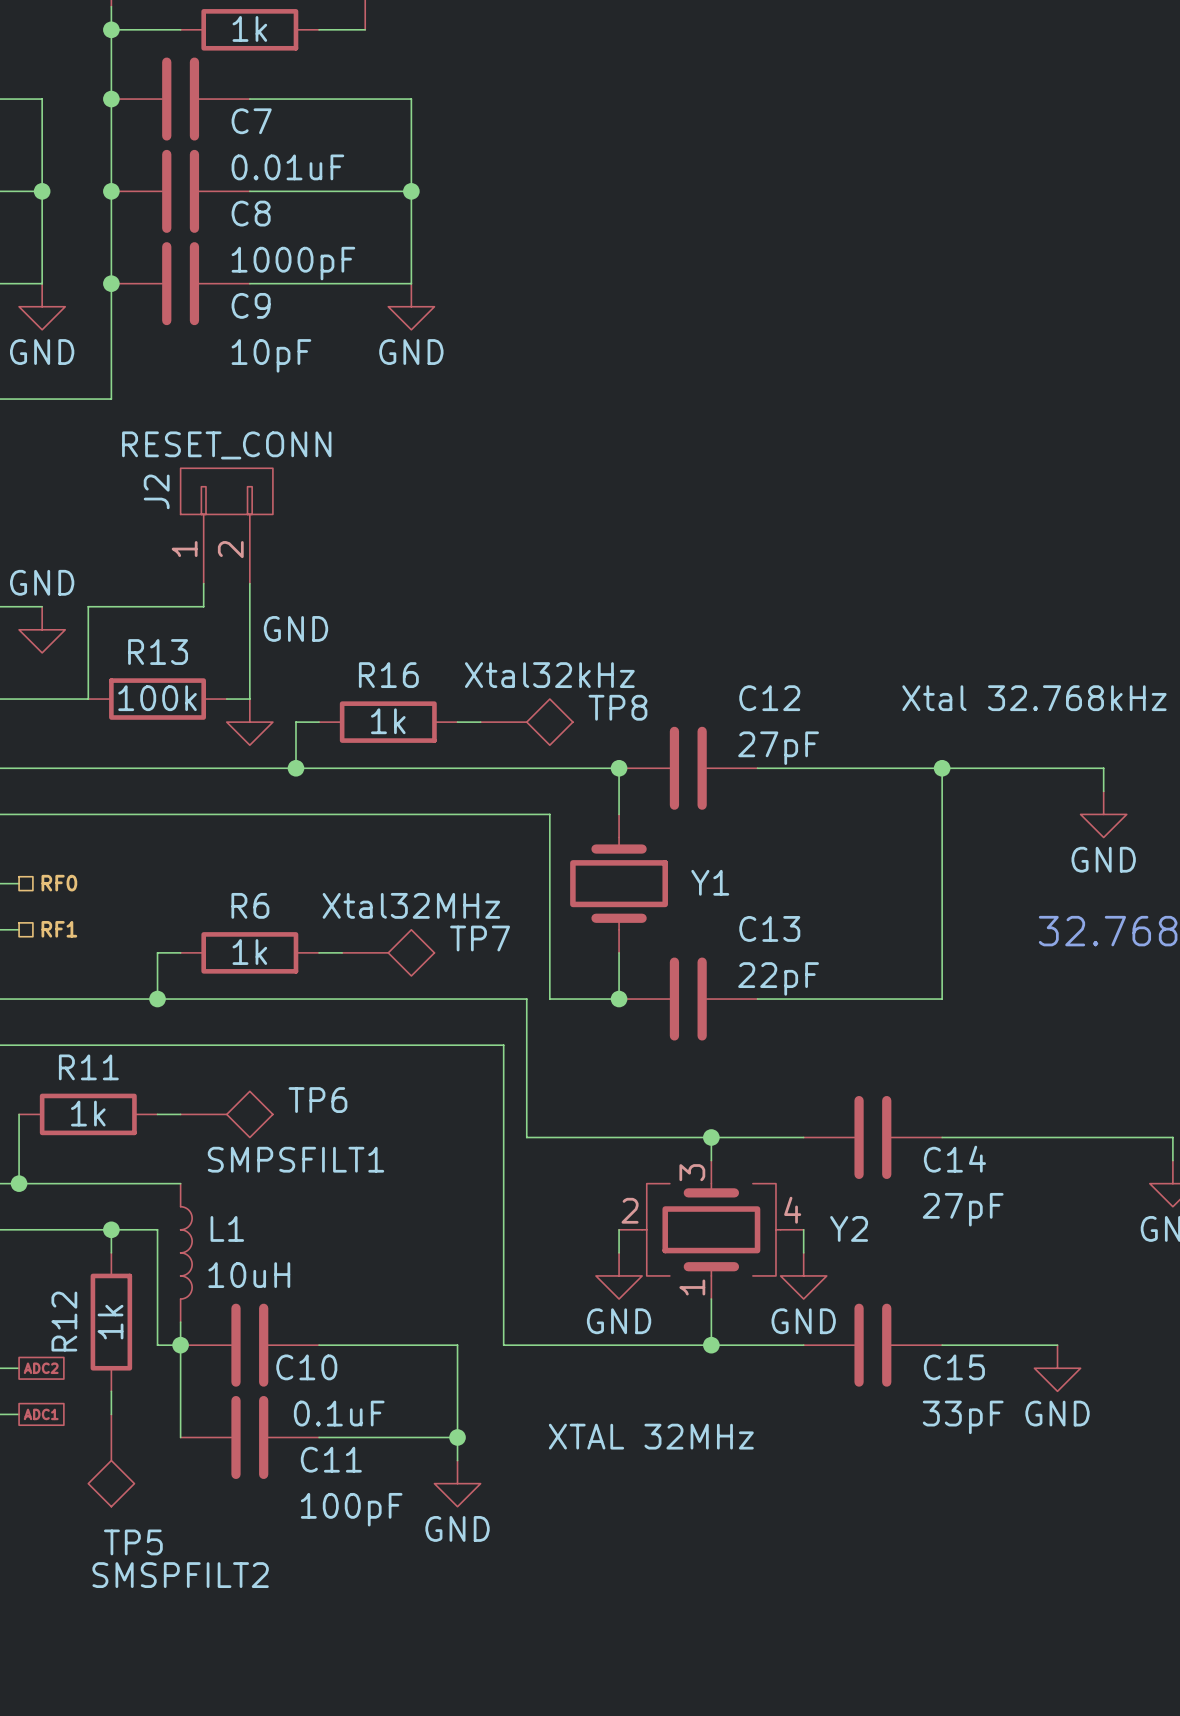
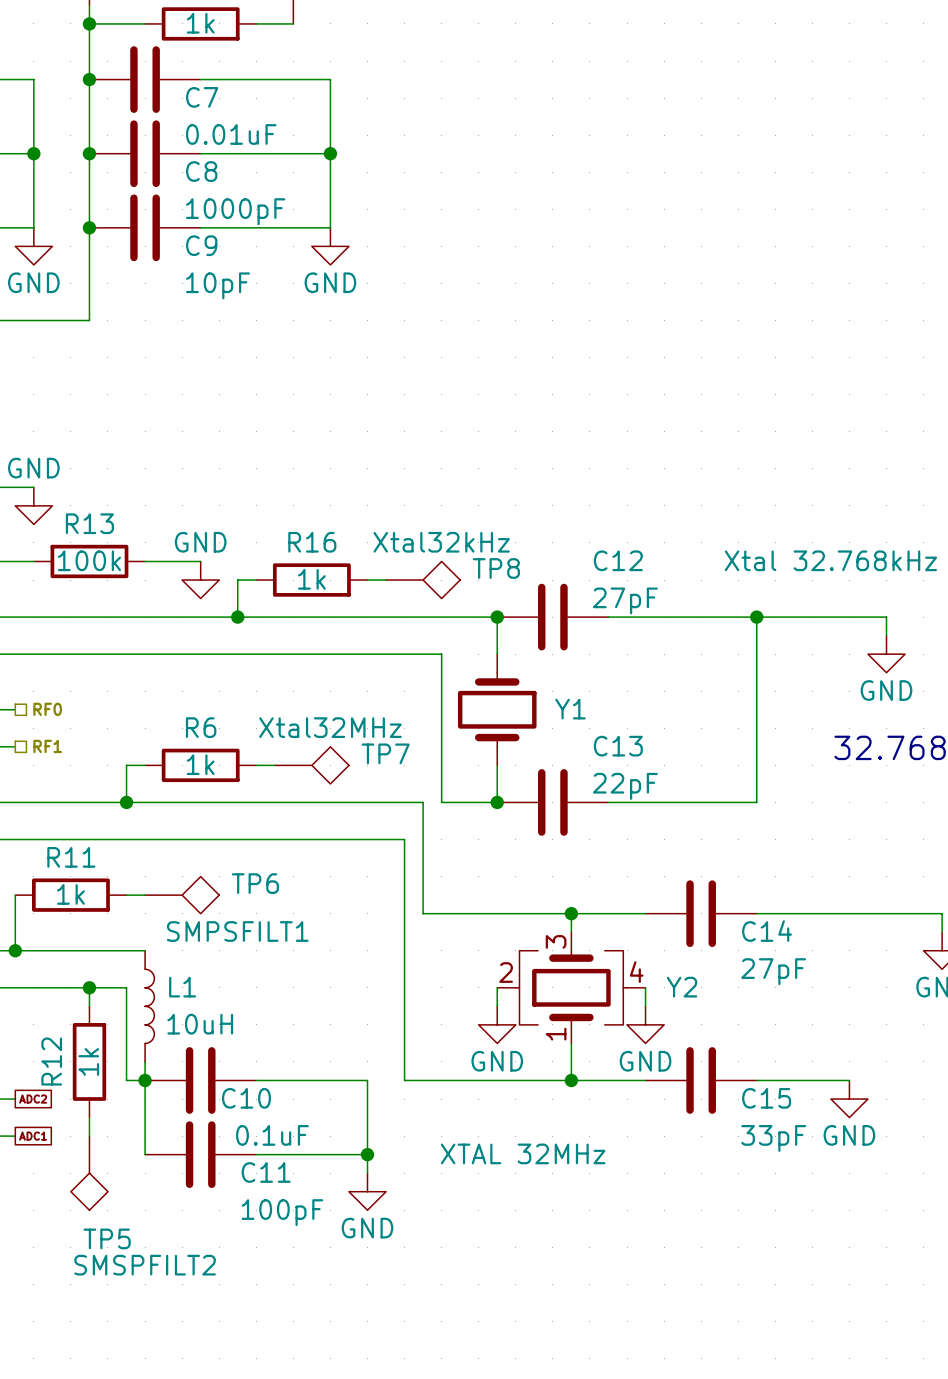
J2: RESET_CONN (226, 525) -> none
wire: (203, 583) (203, 606) (88, 606) (88, 699) (42, 699) -> none
wire: (249, 583) (249, 699) -> none
power symbol text position: GND (295, 628) -> GND (200, 542)
R13 position: (157, 699) -> (89, 561)

